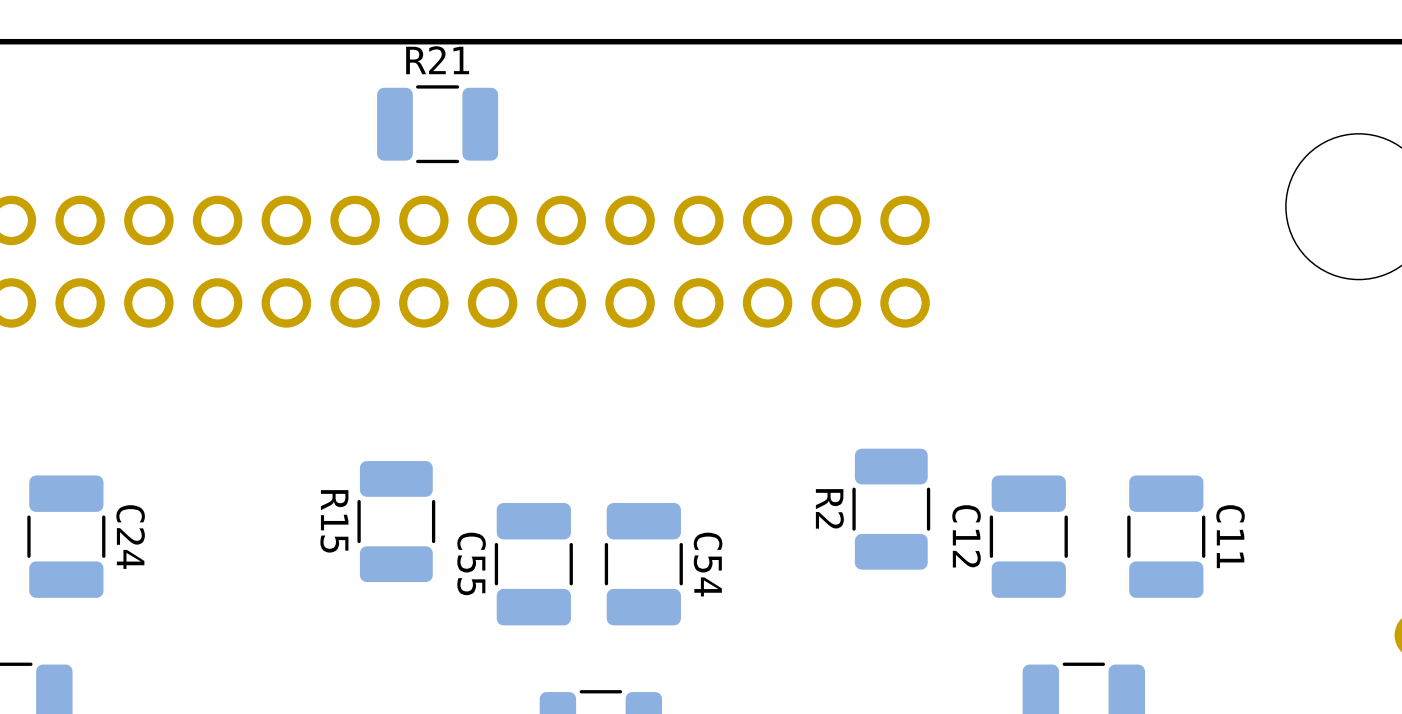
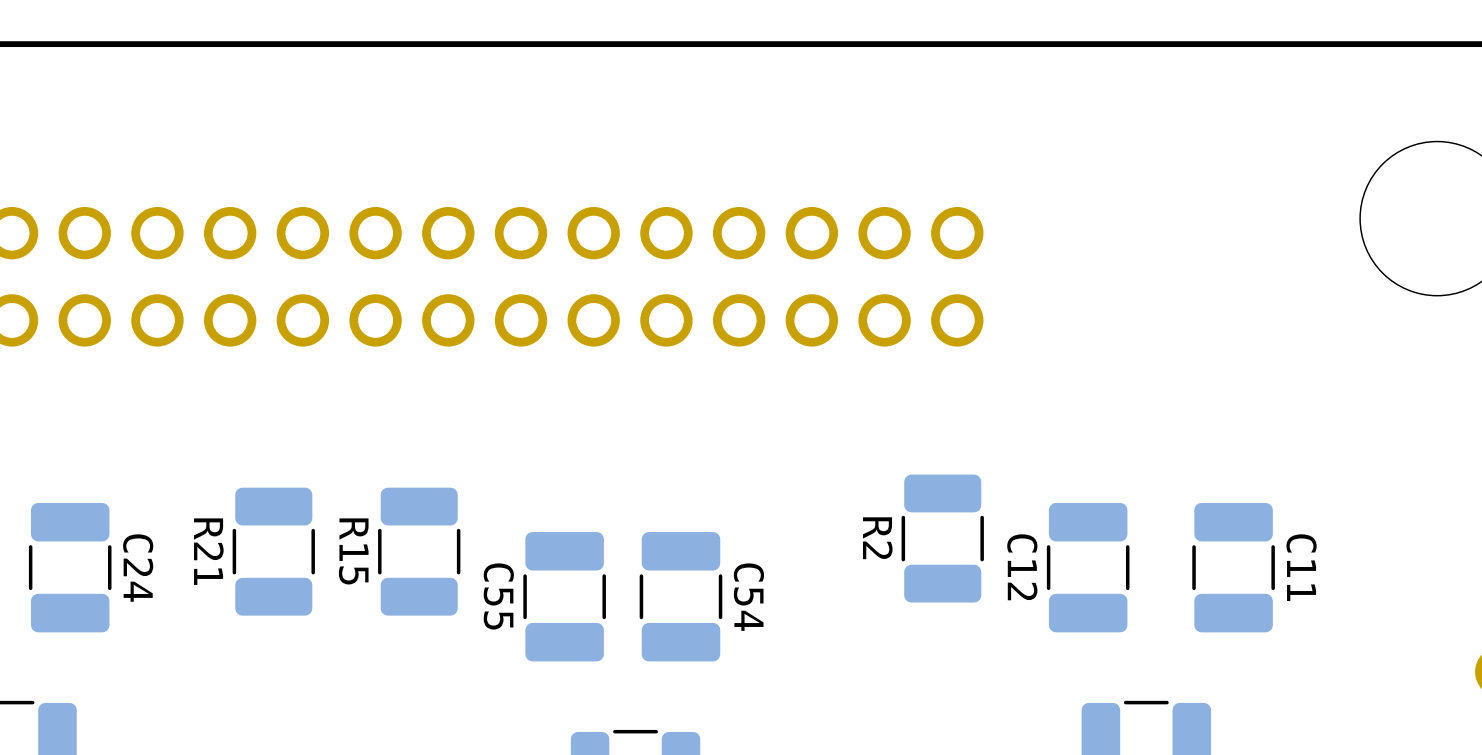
R21 name position: R21 (437, 60) -> R21 (208, 551)
R21 rotation: 0° (437, 124) -> 90° clockwise (273, 551)
R21 position: (437, 124) -> (273, 551)

